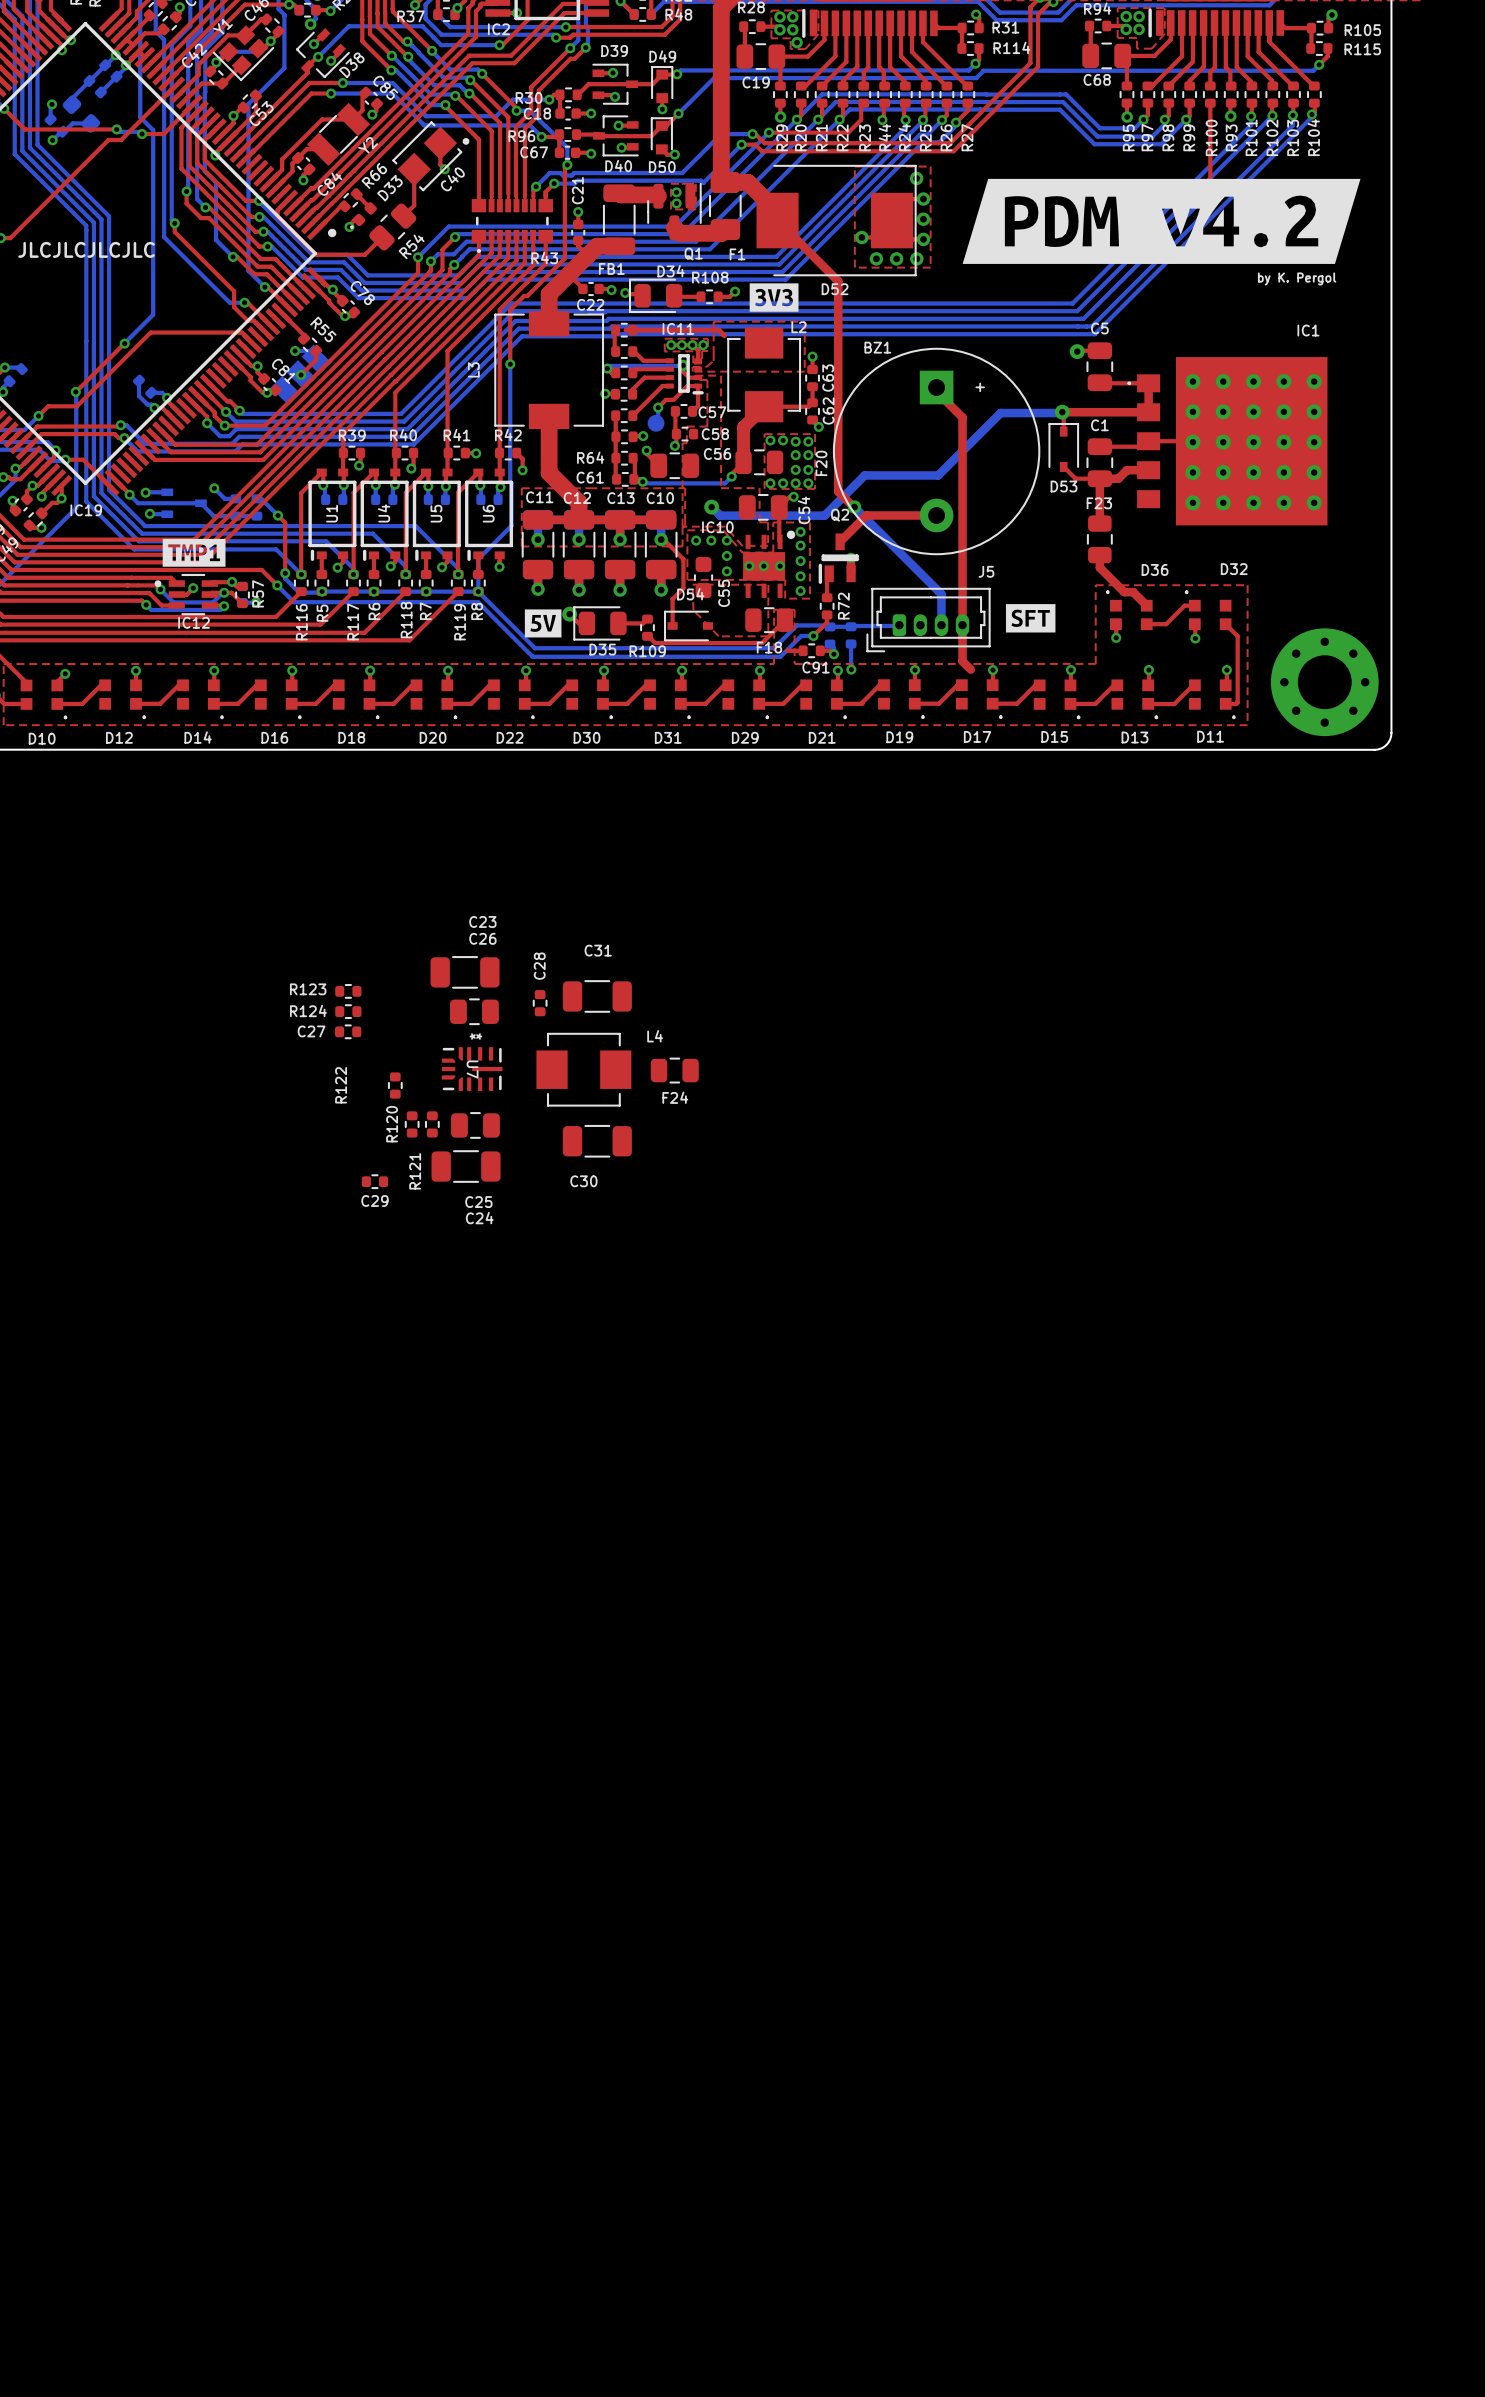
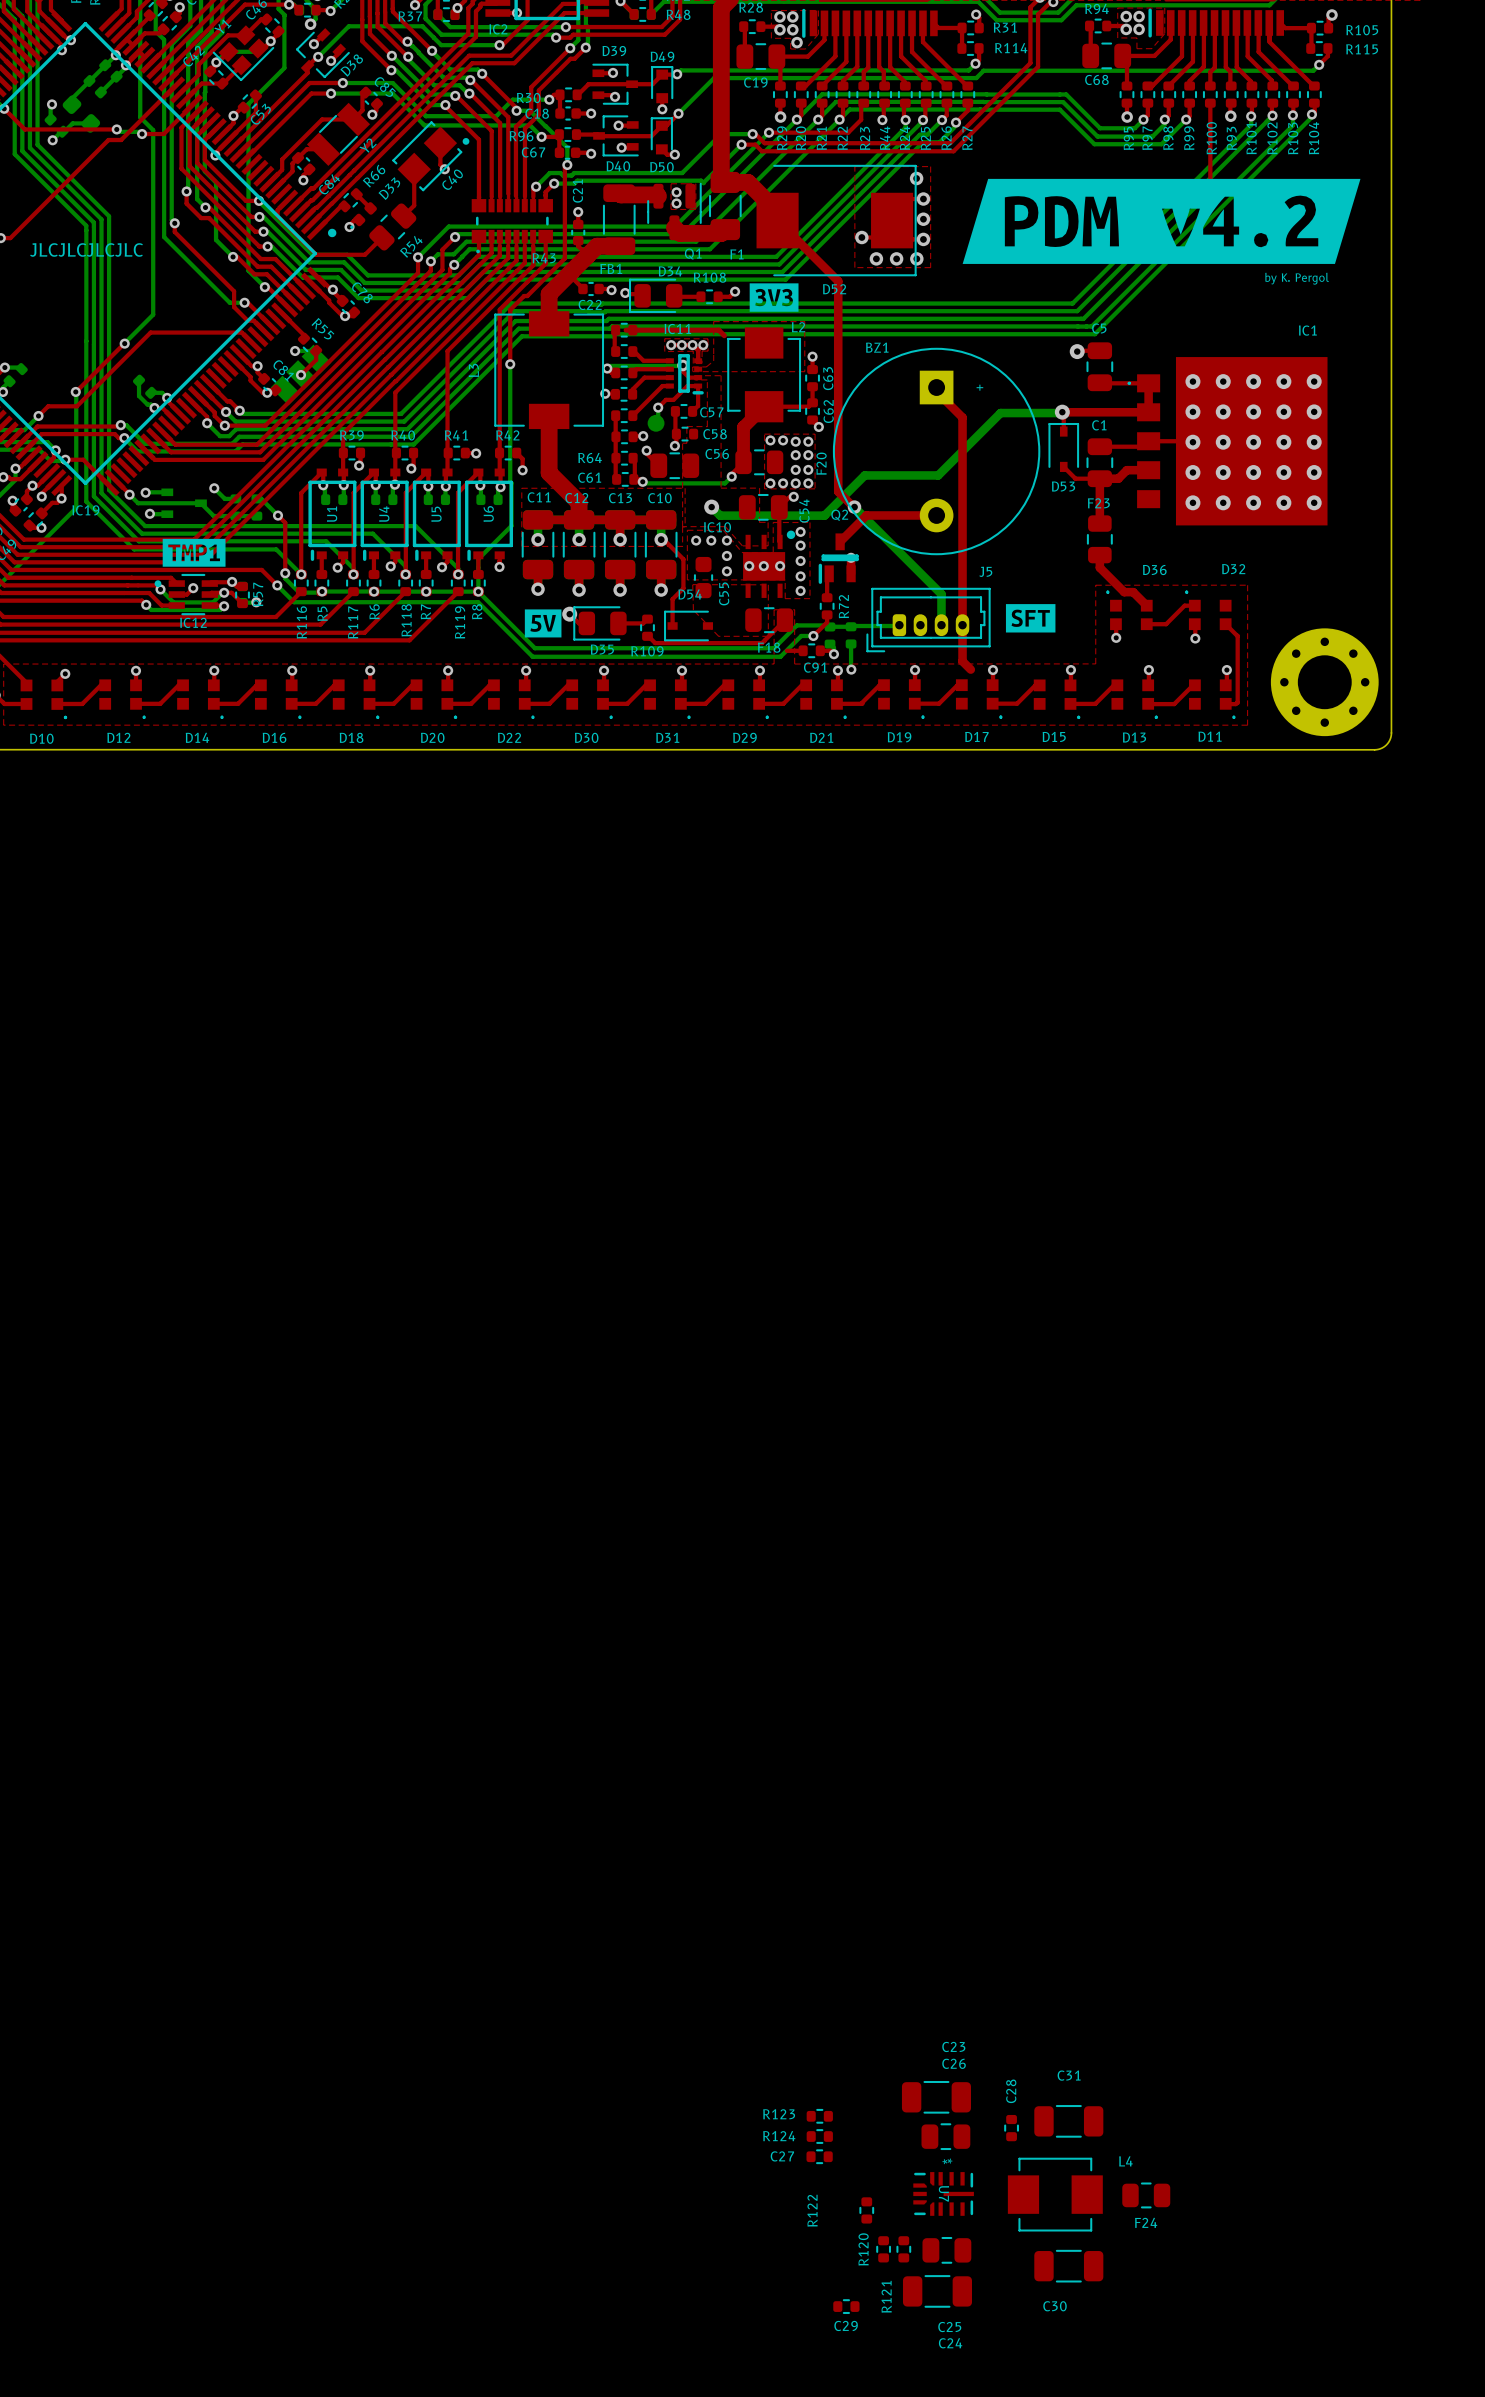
C23 position: (465, 972) -> (936, 2097)
R123 position: (348, 991) -> (819, 2116)
C31 position: (597, 996) -> (1068, 2121)
C28 position: (540, 1003) -> (1011, 2128)
R124 position: (348, 1011) -> (819, 2136)
C26 position: (474, 1011) -> (945, 2136)
C27 position: (348, 1031) -> (819, 2156)
U7 position: (472, 1069) -> (943, 2193)
L4 position: (583, 1069) -> (1055, 2194)
F24 position: (674, 1070) -> (1146, 2195)
R122 position: (395, 1085) -> (866, 2210)
R120 position: (412, 1124) -> (883, 2249)
R121 position: (432, 1124) -> (903, 2249)
C25 position: (475, 1125) -> (946, 2250)
C30 position: (597, 1141) -> (1068, 2266)
C24 position: (466, 1166) -> (937, 2291)
C29 position: (374, 1181) -> (846, 2306)

